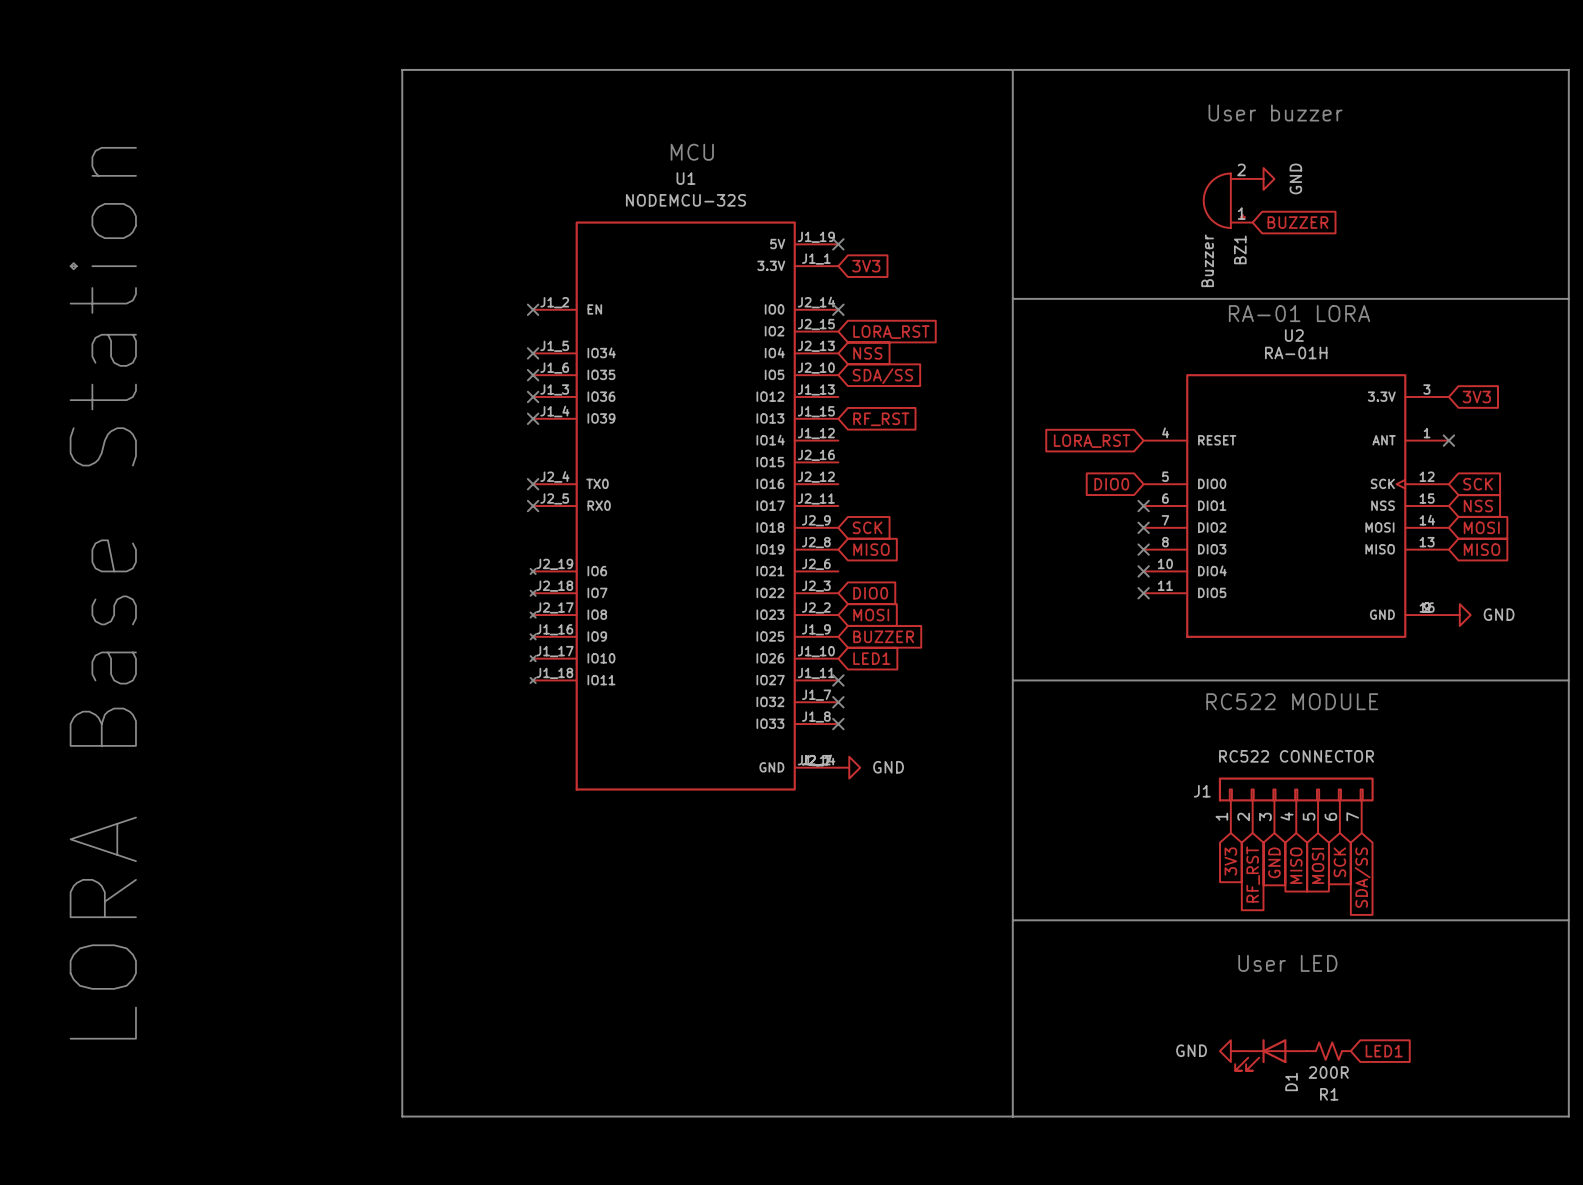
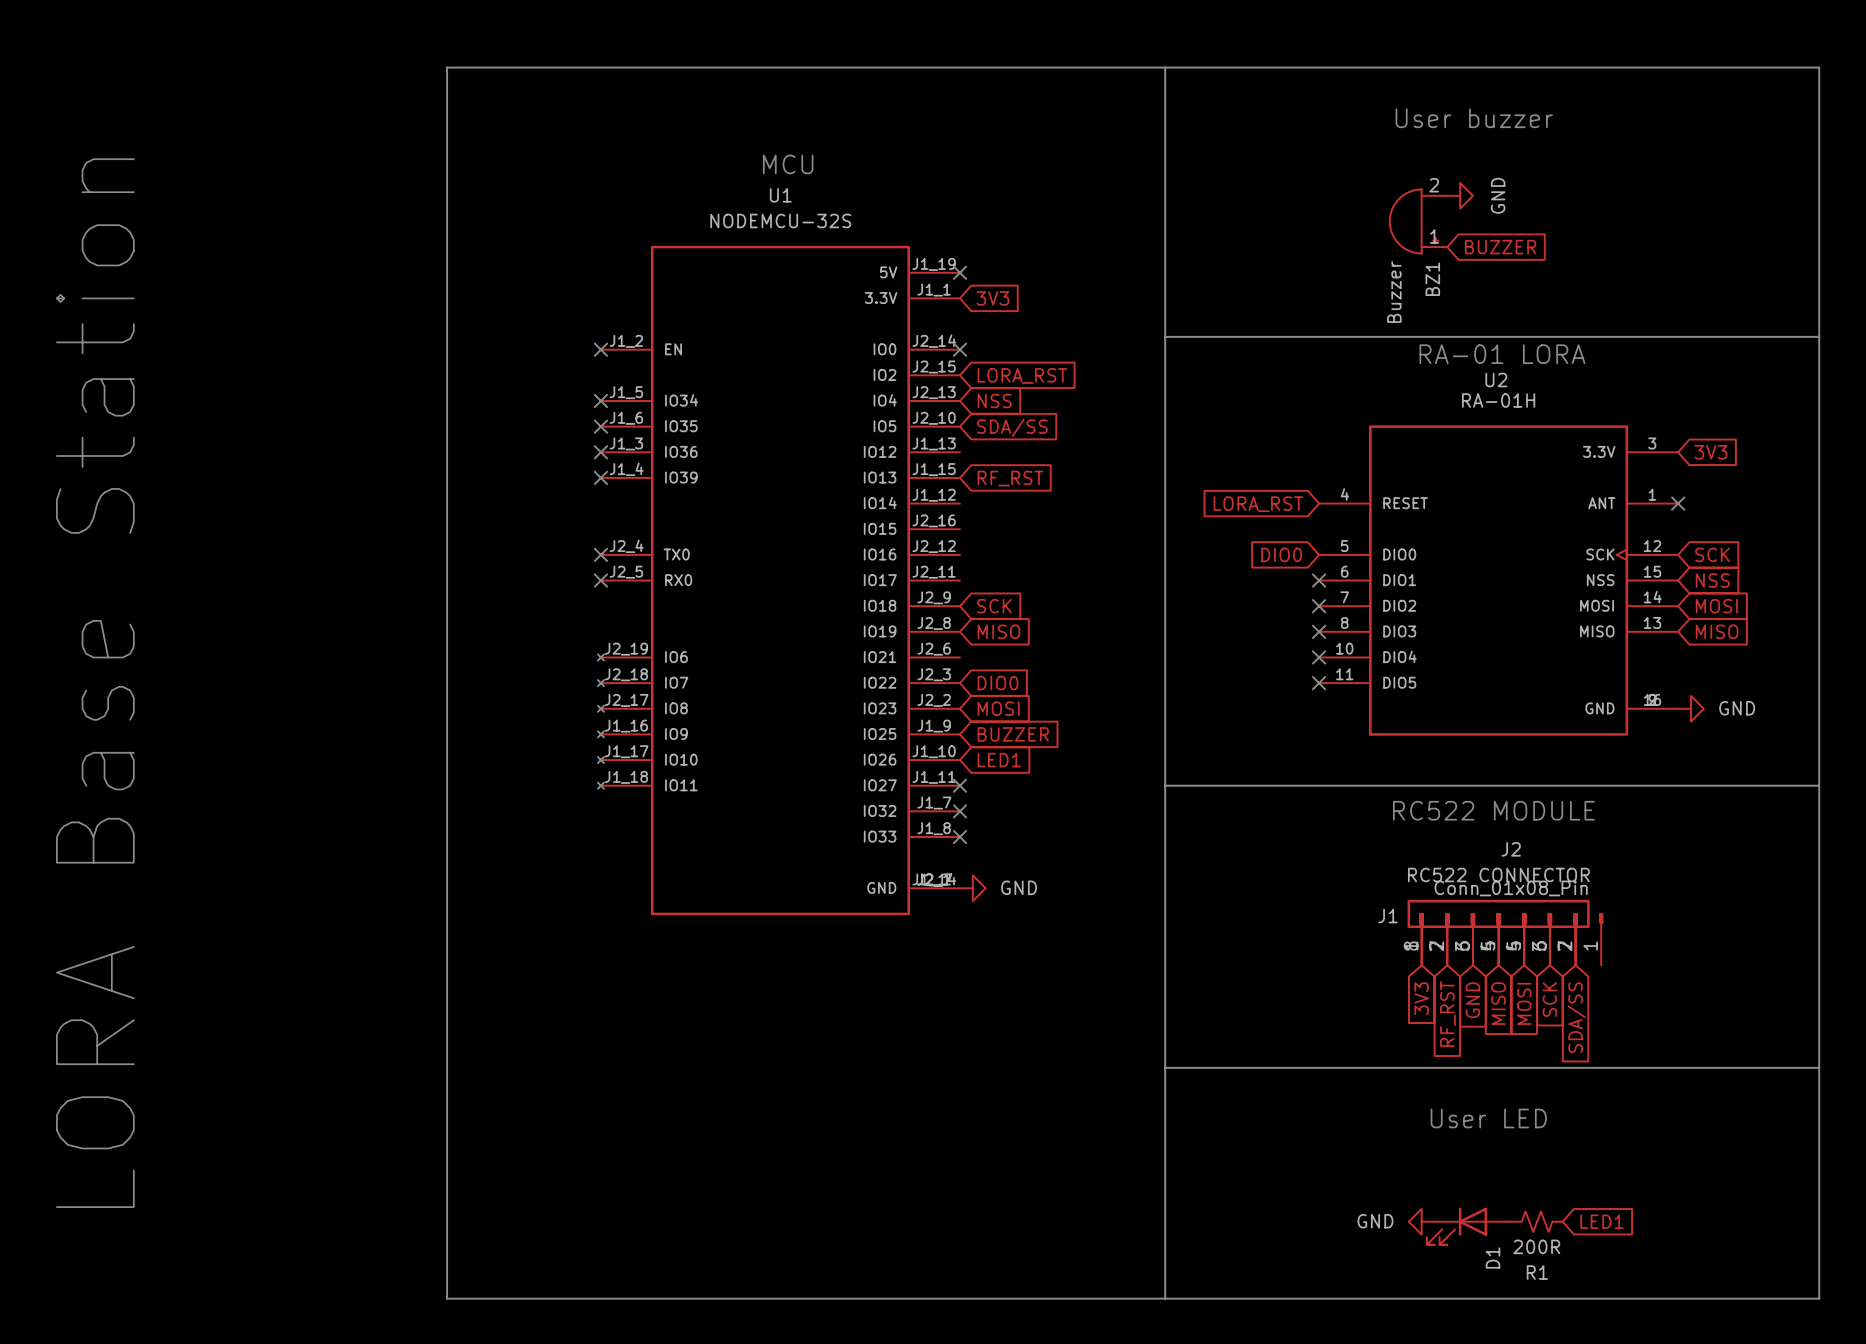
J2: none -> Conn_01x08_Pin (1511, 939)

